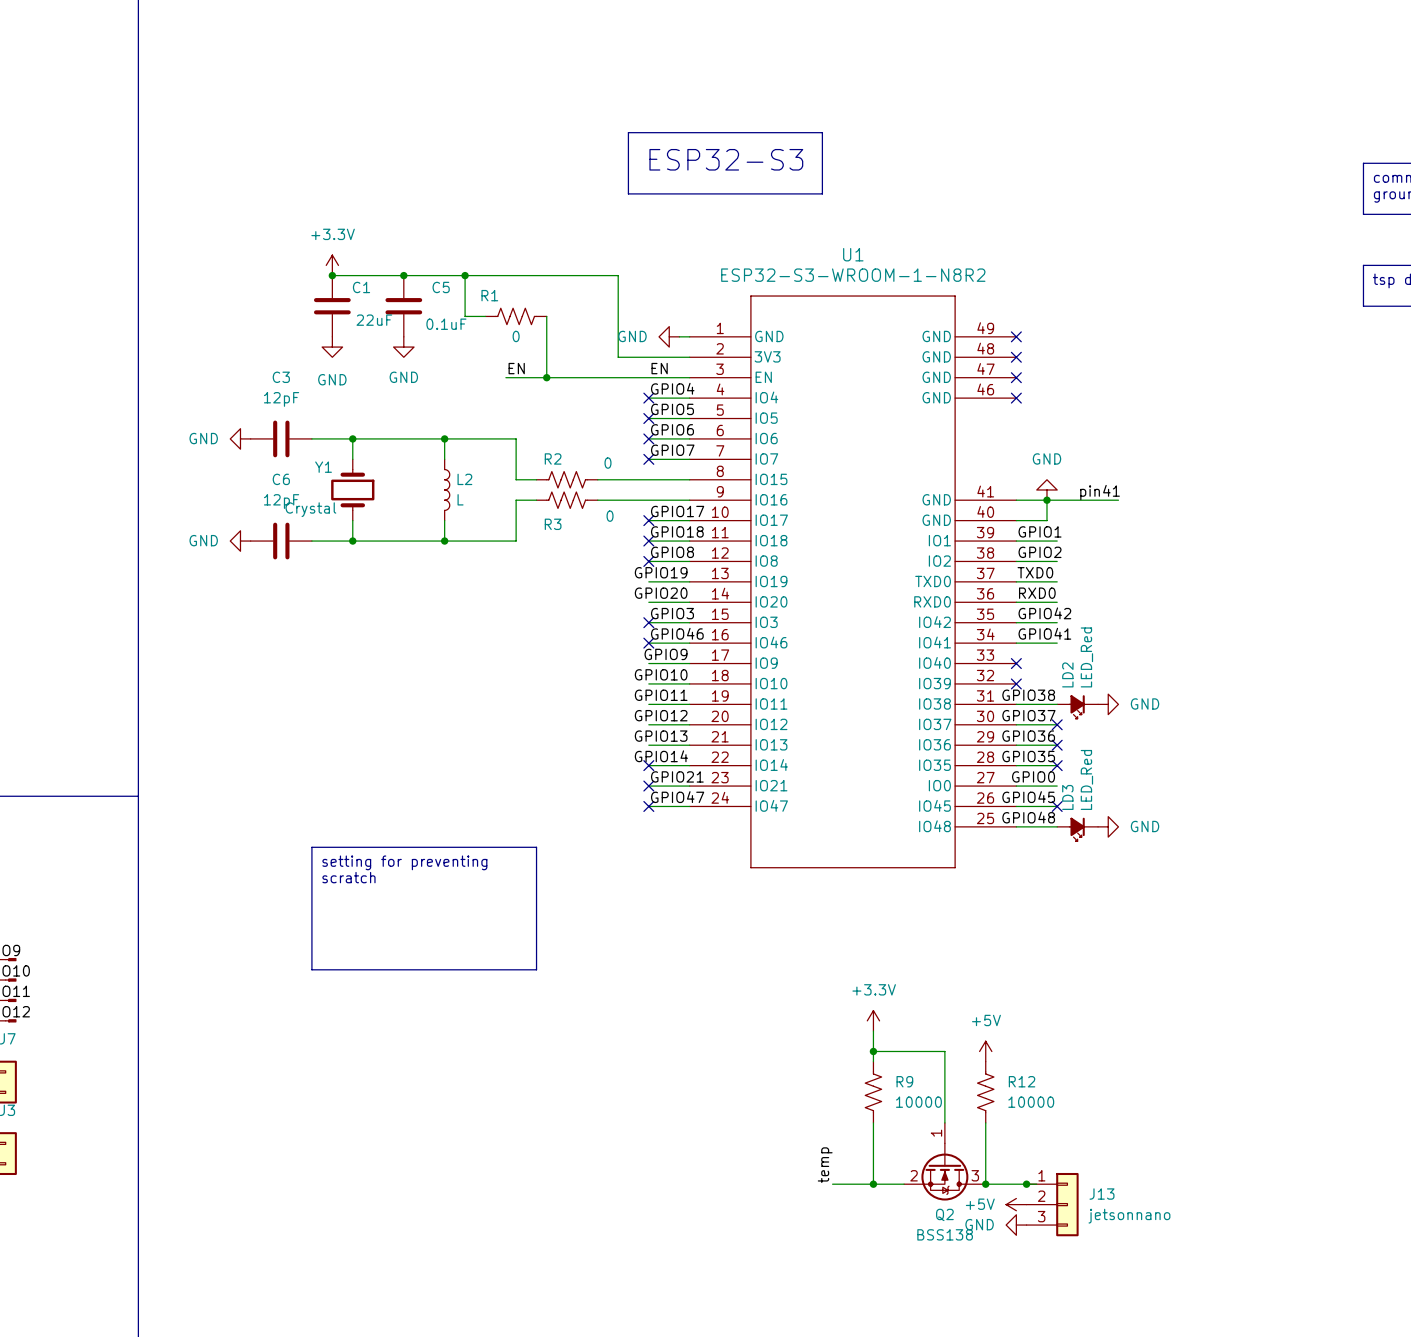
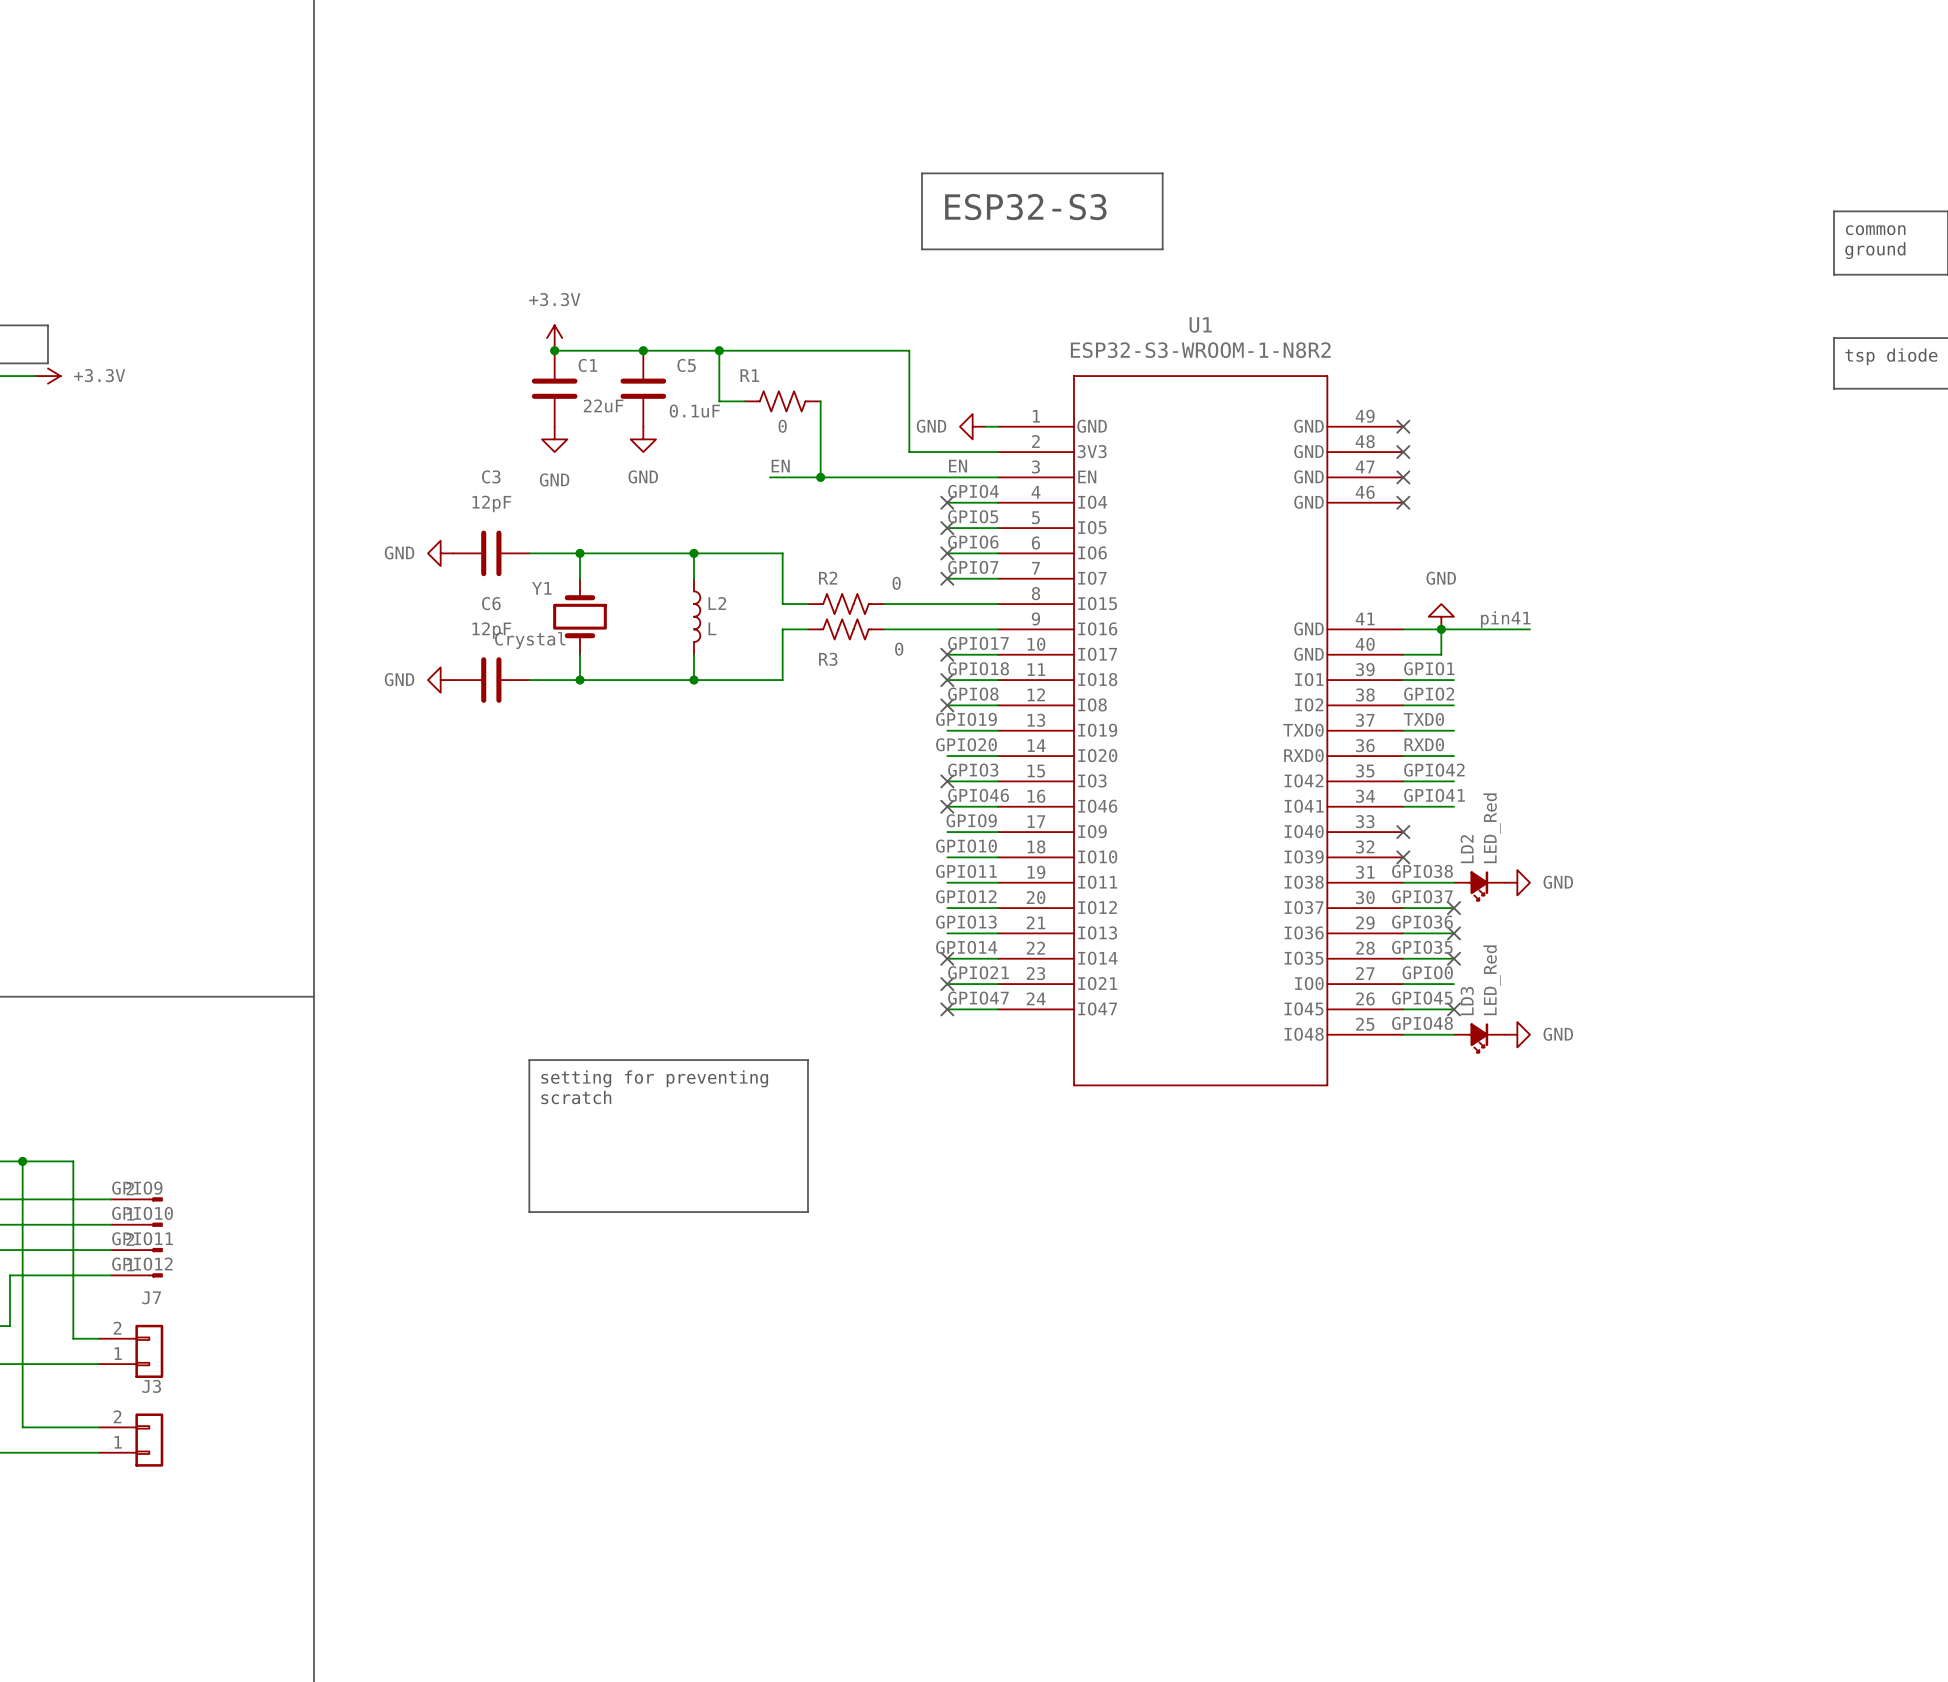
power symbol: +3.3V (873, 1020) -> none
wire: (873, 1031) (873, 1061) -> none
wire: (873, 1051) (944, 1051) (944, 1122) -> none
junction: (873, 1051) -> none
power symbol: +5V (985, 1051) -> none
R9: 10000 (873, 1092) -> none
R12: 10000 (985, 1092) -> none
wire: (873, 1122) (873, 1184) -> none
wire: (985, 1122) (985, 1184) (1036, 1184) -> none
Q2: BSS138 (944, 1161) -> none
label: temp (825, 1165) -> none
wire: (832, 1184) (904, 1184) -> none
junction: (873, 1184) -> none
junction: (985, 1184) -> none
junction: (1026, 1184) -> none
power symbol: +5V (1016, 1204) -> none
J13: jetsonnano (1052, 1204) -> none
power symbol: GND (1016, 1225) -> none

